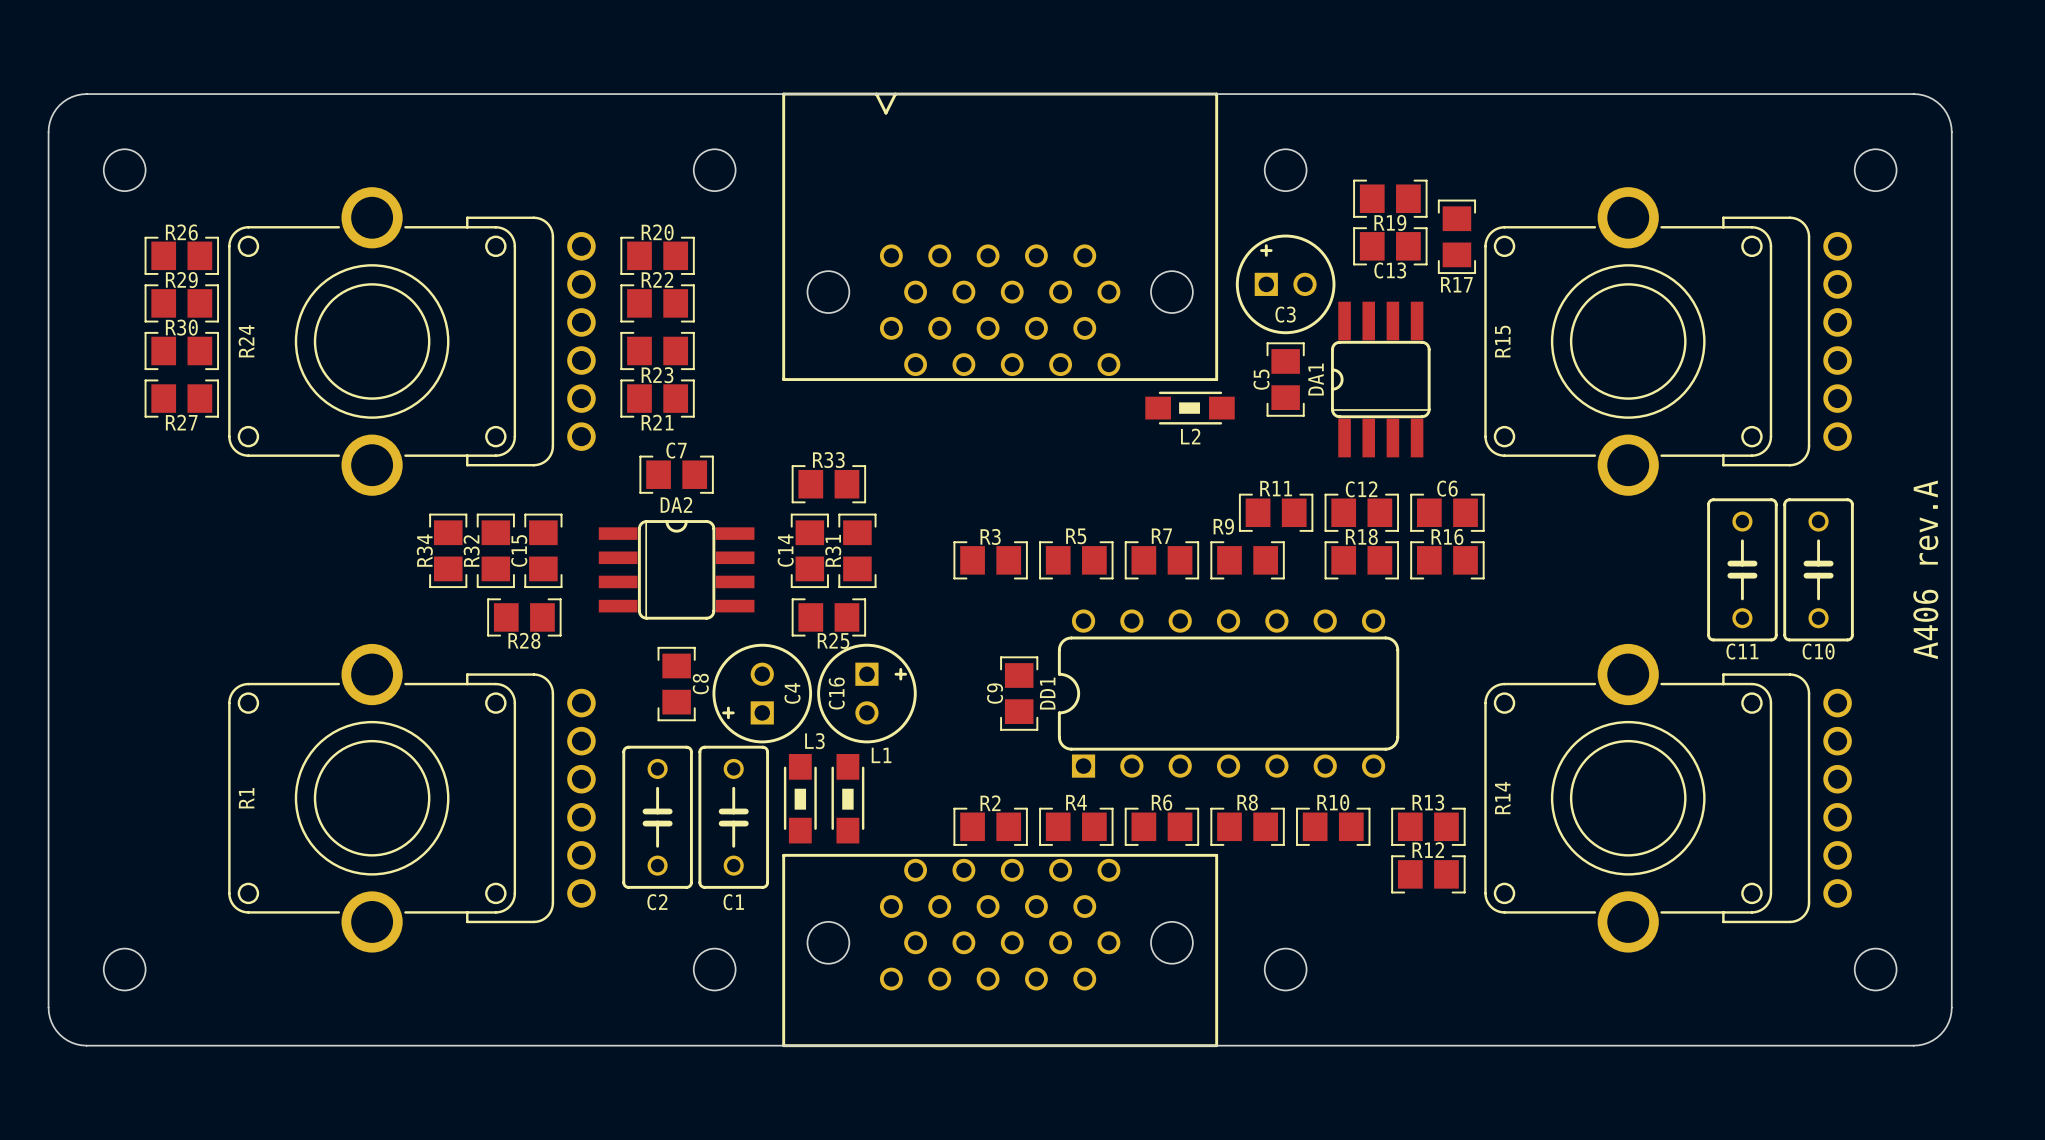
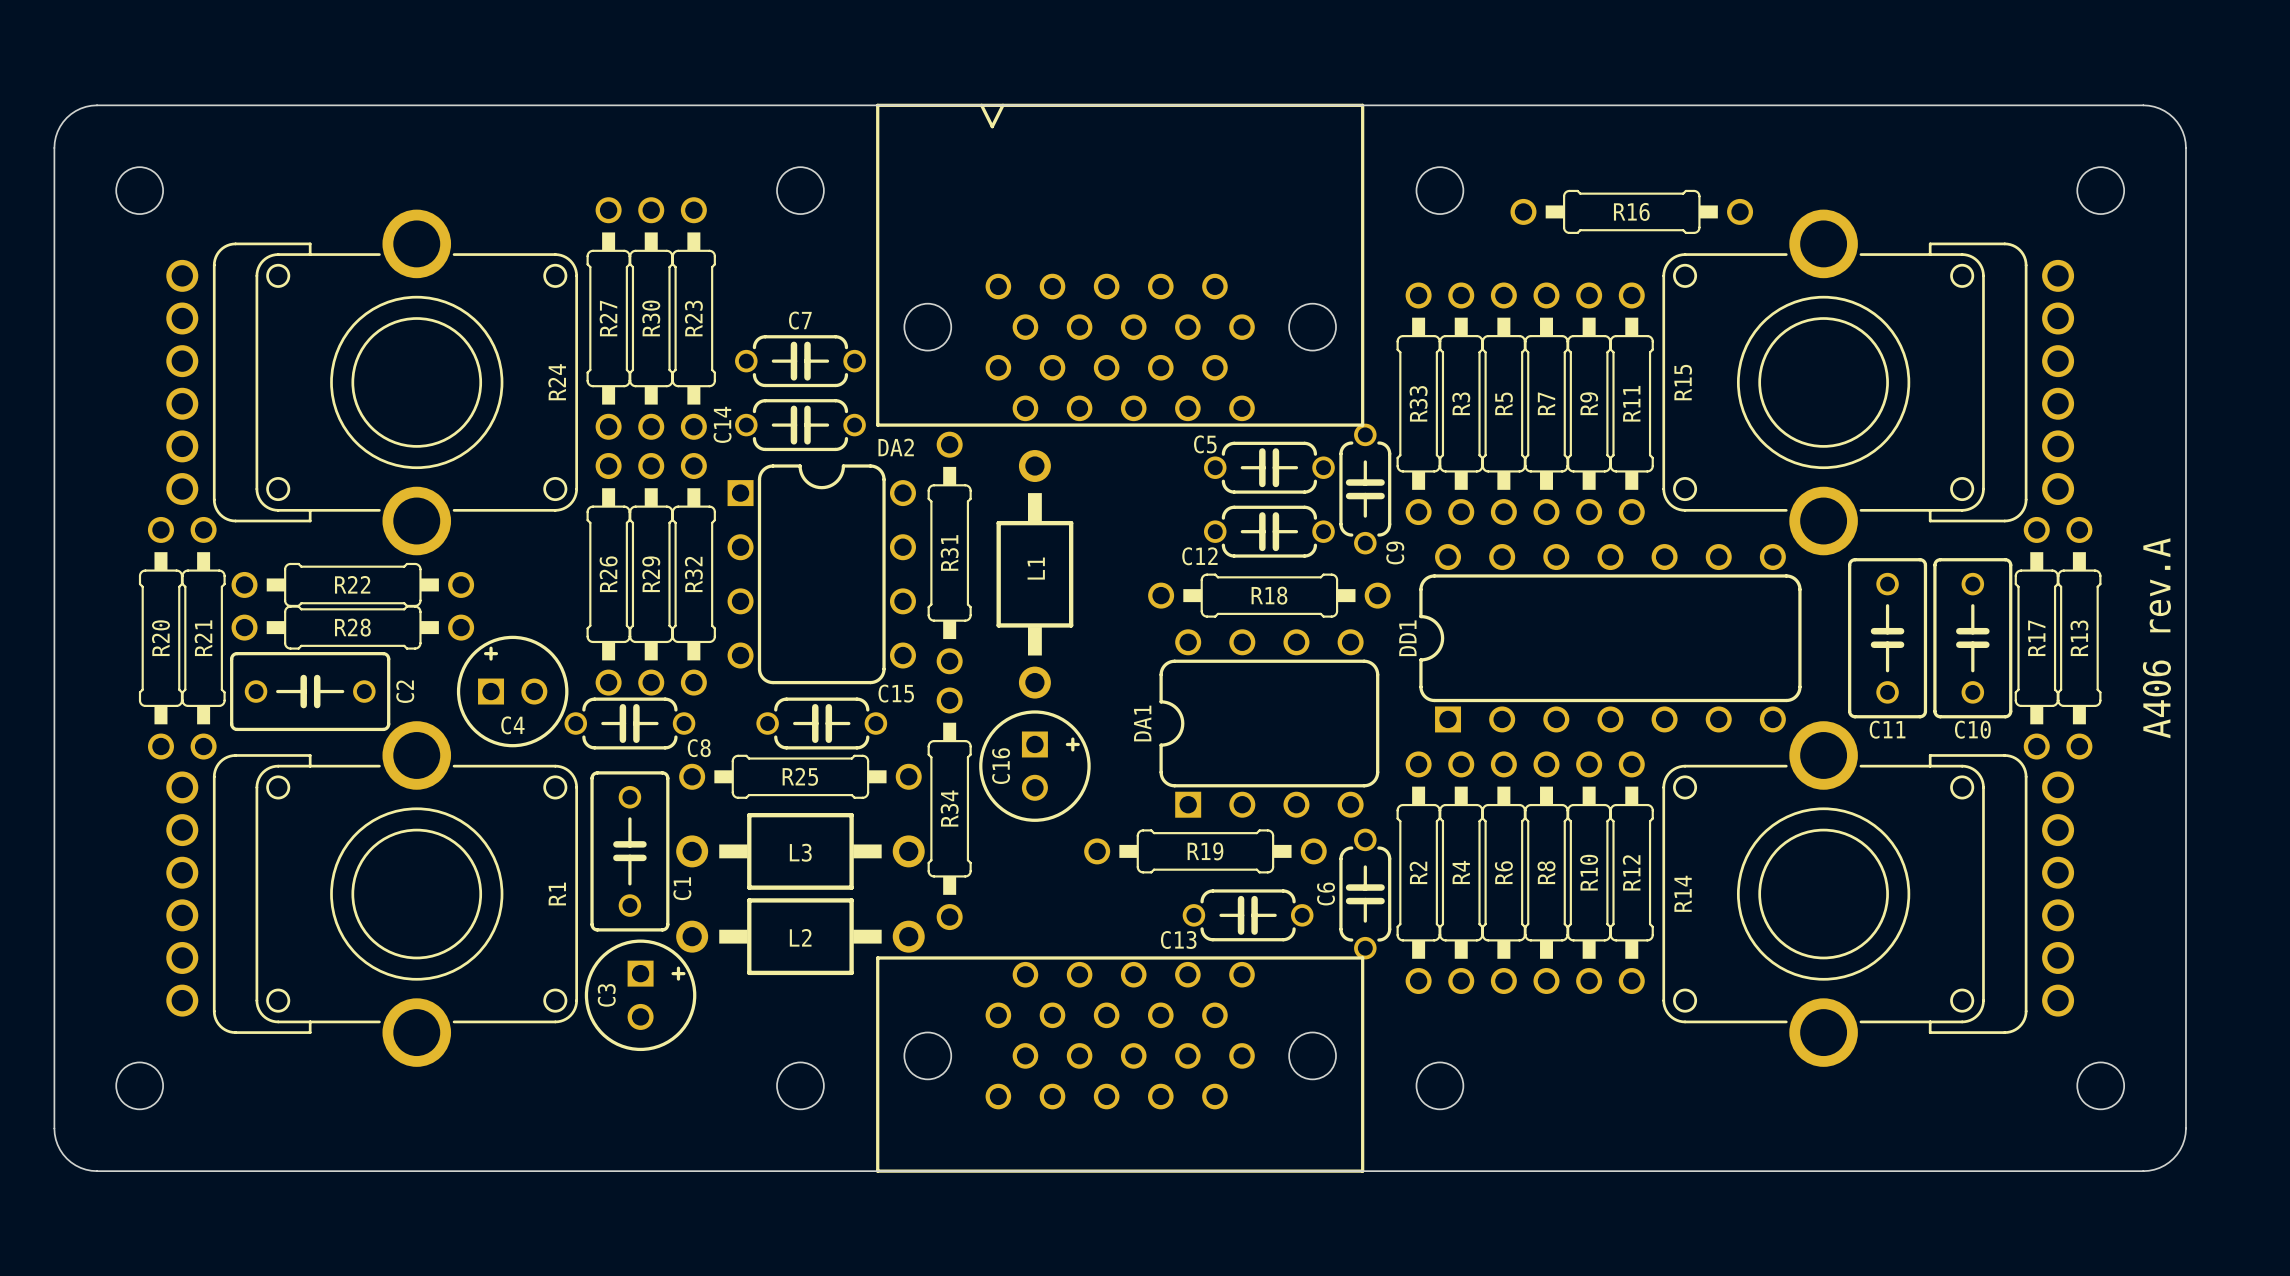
R19 footprint: [1353, 179, 1428, 218] -> [1084, 829, 1327, 874]
R17 footprint: [1437, 199, 1477, 275] -> [2014, 516, 2059, 760]
C13 footprint: [1353, 227, 1428, 266] -> [1182, 889, 1314, 942]
R26 footprint: [144, 236, 220, 275] -> [586, 453, 631, 696]
R20 footprint: [620, 236, 695, 275] -> [138, 516, 184, 760]
C13 name position: C13 (1390, 270) -> C13 (1178, 939)
R29 footprint: [144, 284, 220, 323] -> [629, 453, 674, 696]
R22 footprint: [620, 284, 695, 323] -> [231, 562, 475, 608]
C3 rotation: 0° (1285, 284) -> 90° clockwise (640, 995)
C3 position: (1285, 284) -> (640, 995)
R17 name position: R17 (1456, 284) -> R17 (2036, 638)
DA1 footprint: [1331, 301, 1431, 458] -> [1159, 629, 1380, 818]
R30 footprint: [144, 331, 220, 371] -> [629, 197, 674, 440]
R23 footprint: [620, 331, 695, 371] -> [671, 197, 716, 440]
R24 rotation: 0° (411, 341) -> 180° (372, 382)
C5 footprint: [1266, 342, 1305, 417] -> [1204, 441, 1335, 494]
R27 footprint: [144, 379, 220, 418] -> [586, 197, 631, 440]
R21 footprint: [620, 379, 695, 418] -> [181, 516, 226, 760]
C5 name position: C5 (1261, 379) -> C5 (1205, 444)
DA1 name position: DA1 (1316, 379) -> DA1 (1142, 723)
L2 footprint: [1145, 391, 1235, 425] -> [676, 898, 925, 976]
C7 footprint: [639, 455, 714, 494] -> [735, 335, 866, 388]
R33 footprint: [791, 465, 867, 504] -> [1396, 282, 1441, 526]
C6 name position: C6 (1447, 488) -> C6 (1326, 894)
C12 name position: C12 (1361, 489) -> C12 (1199, 556)
R11 footprint: [1238, 493, 1314, 532] -> [1609, 282, 1654, 526]
C12 footprint: [1324, 493, 1400, 532] -> [1204, 505, 1335, 558]
C6 footprint: [1410, 493, 1485, 532] -> [1339, 828, 1392, 960]
DA2 name position: DA2 (676, 504) -> DA2 (896, 447)
R34 footprint: [429, 513, 468, 589] -> [927, 687, 972, 931]
R32 footprint: [476, 513, 515, 589] -> [671, 453, 716, 696]
C15 footprint: [524, 513, 563, 589] -> [756, 697, 888, 750]
C14 footprint: [790, 513, 829, 589] -> [735, 399, 866, 452]
R31 footprint: [838, 513, 877, 589] -> [927, 431, 972, 675]
DA2 footprint: [598, 520, 755, 620] -> [727, 464, 916, 685]
R9 name position: R9 (1223, 526) -> R9 (1589, 403)
R3 footprint: [953, 541, 1028, 580] -> [1439, 282, 1484, 526]
R5 footprint: [1039, 541, 1114, 580] -> [1481, 282, 1526, 526]
R7 footprint: [1124, 541, 1200, 580] -> [1524, 282, 1569, 526]
R9 footprint: [1210, 541, 1285, 580] -> [1567, 282, 1612, 526]
R18 footprint: [1324, 541, 1400, 580] -> [1148, 573, 1391, 618]
R16 footprint: [1410, 541, 1485, 580] -> [1510, 189, 1754, 234]
C15 name position: C15 (519, 550) -> C15 (896, 693)
C14 name position: C14 (785, 550) -> C14 (722, 424)
C11 position: (1742, 569) -> (1887, 638)
C10 position: (1818, 569) -> (1972, 638)
R28 footprint: [487, 598, 562, 637] -> [231, 605, 475, 650]
R25 footprint: [791, 598, 867, 637] -> [679, 754, 922, 799]
C8 footprint: [657, 646, 696, 722] -> [564, 697, 696, 750]
C9 footprint: [1000, 656, 1039, 731] -> [1339, 423, 1392, 555]
C8 name position: C8 (700, 684) -> C8 (699, 748)
C4 rotation: 0° (762, 693) -> 90° clockwise (512, 691)
C4 position: (762, 693) -> (512, 691)
C16 position: (866, 693) -> (1034, 766)
C9 name position: C9 (995, 693) -> C9 (1395, 552)
DD1 position: (1228, 693) -> (1610, 638)
L3 name position: L3 (814, 741) -> L3 (800, 852)
L3 footprint: [783, 754, 817, 844] -> [676, 813, 925, 890]
L1 footprint: [831, 754, 865, 844] -> [996, 450, 1074, 699]
L1 name position: L1 (881, 755) -> L1 (1036, 568)
R1 rotation: 0° (411, 798) -> 180° (372, 894)
R2 footprint: [953, 807, 1028, 846] -> [1396, 751, 1441, 994]
R4 footprint: [1039, 807, 1114, 846] -> [1439, 751, 1484, 994]
R6 footprint: [1124, 807, 1200, 846] -> [1481, 751, 1526, 994]
R8 footprint: [1210, 807, 1285, 846] -> [1524, 751, 1569, 994]
R10 footprint: [1296, 807, 1371, 846] -> [1567, 751, 1612, 994]
R13 footprint: [1391, 807, 1466, 846] -> [2057, 516, 2102, 760]
C2 rotation: 0° (657, 817) -> 90° counterclockwise (310, 691)
C2 position: (657, 817) -> (310, 691)
C1 rotation: 0° (733, 817) -> 180° (629, 851)
C1 position: (733, 817) -> (629, 851)
R12 footprint: [1391, 855, 1466, 894] -> [1609, 751, 1654, 994]
C1 name position: C1 (733, 902) -> C1 (682, 888)

